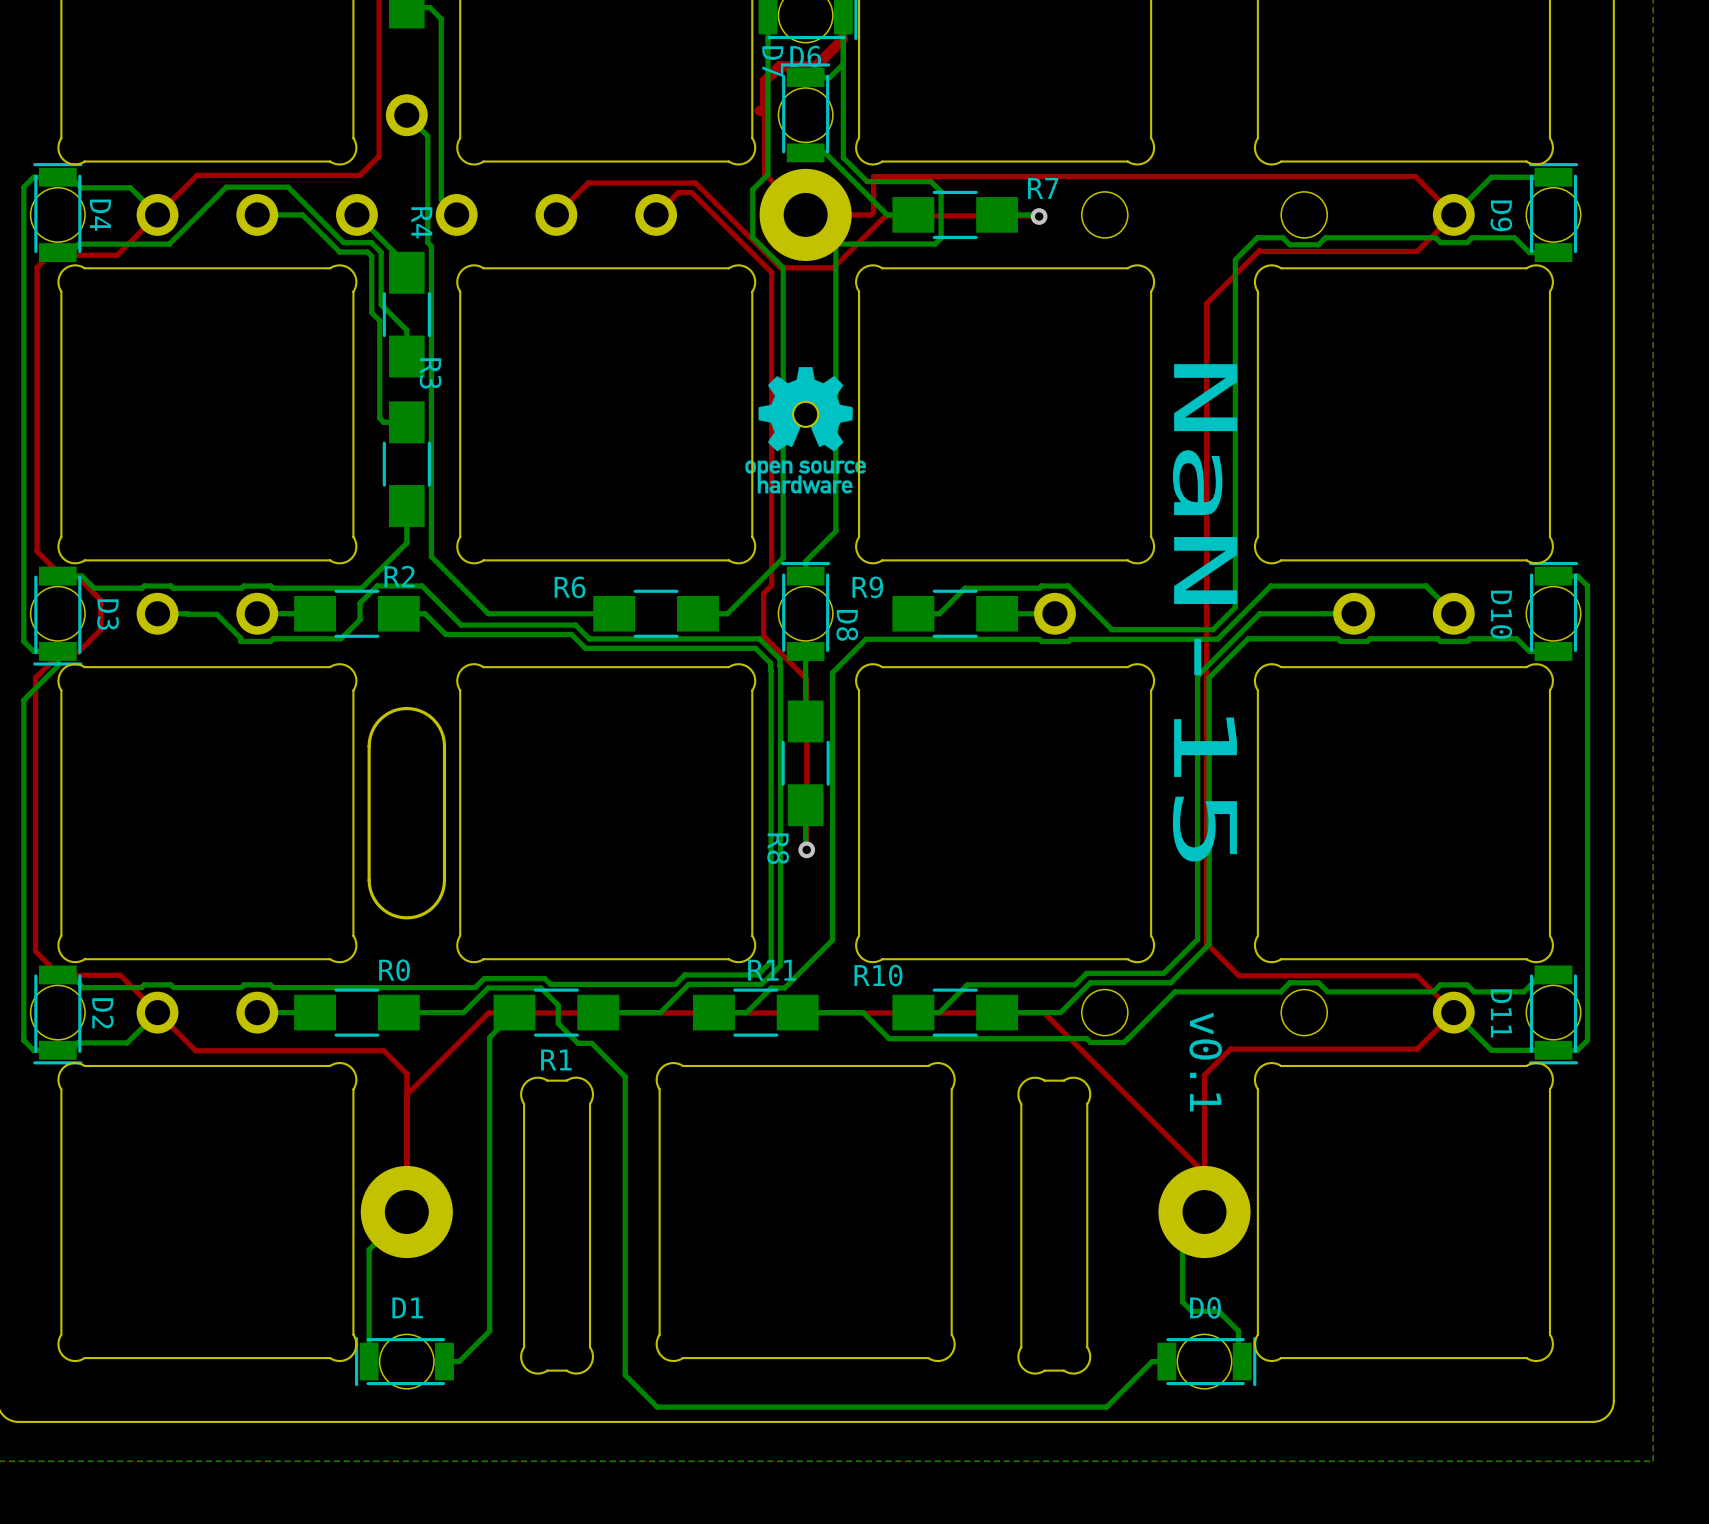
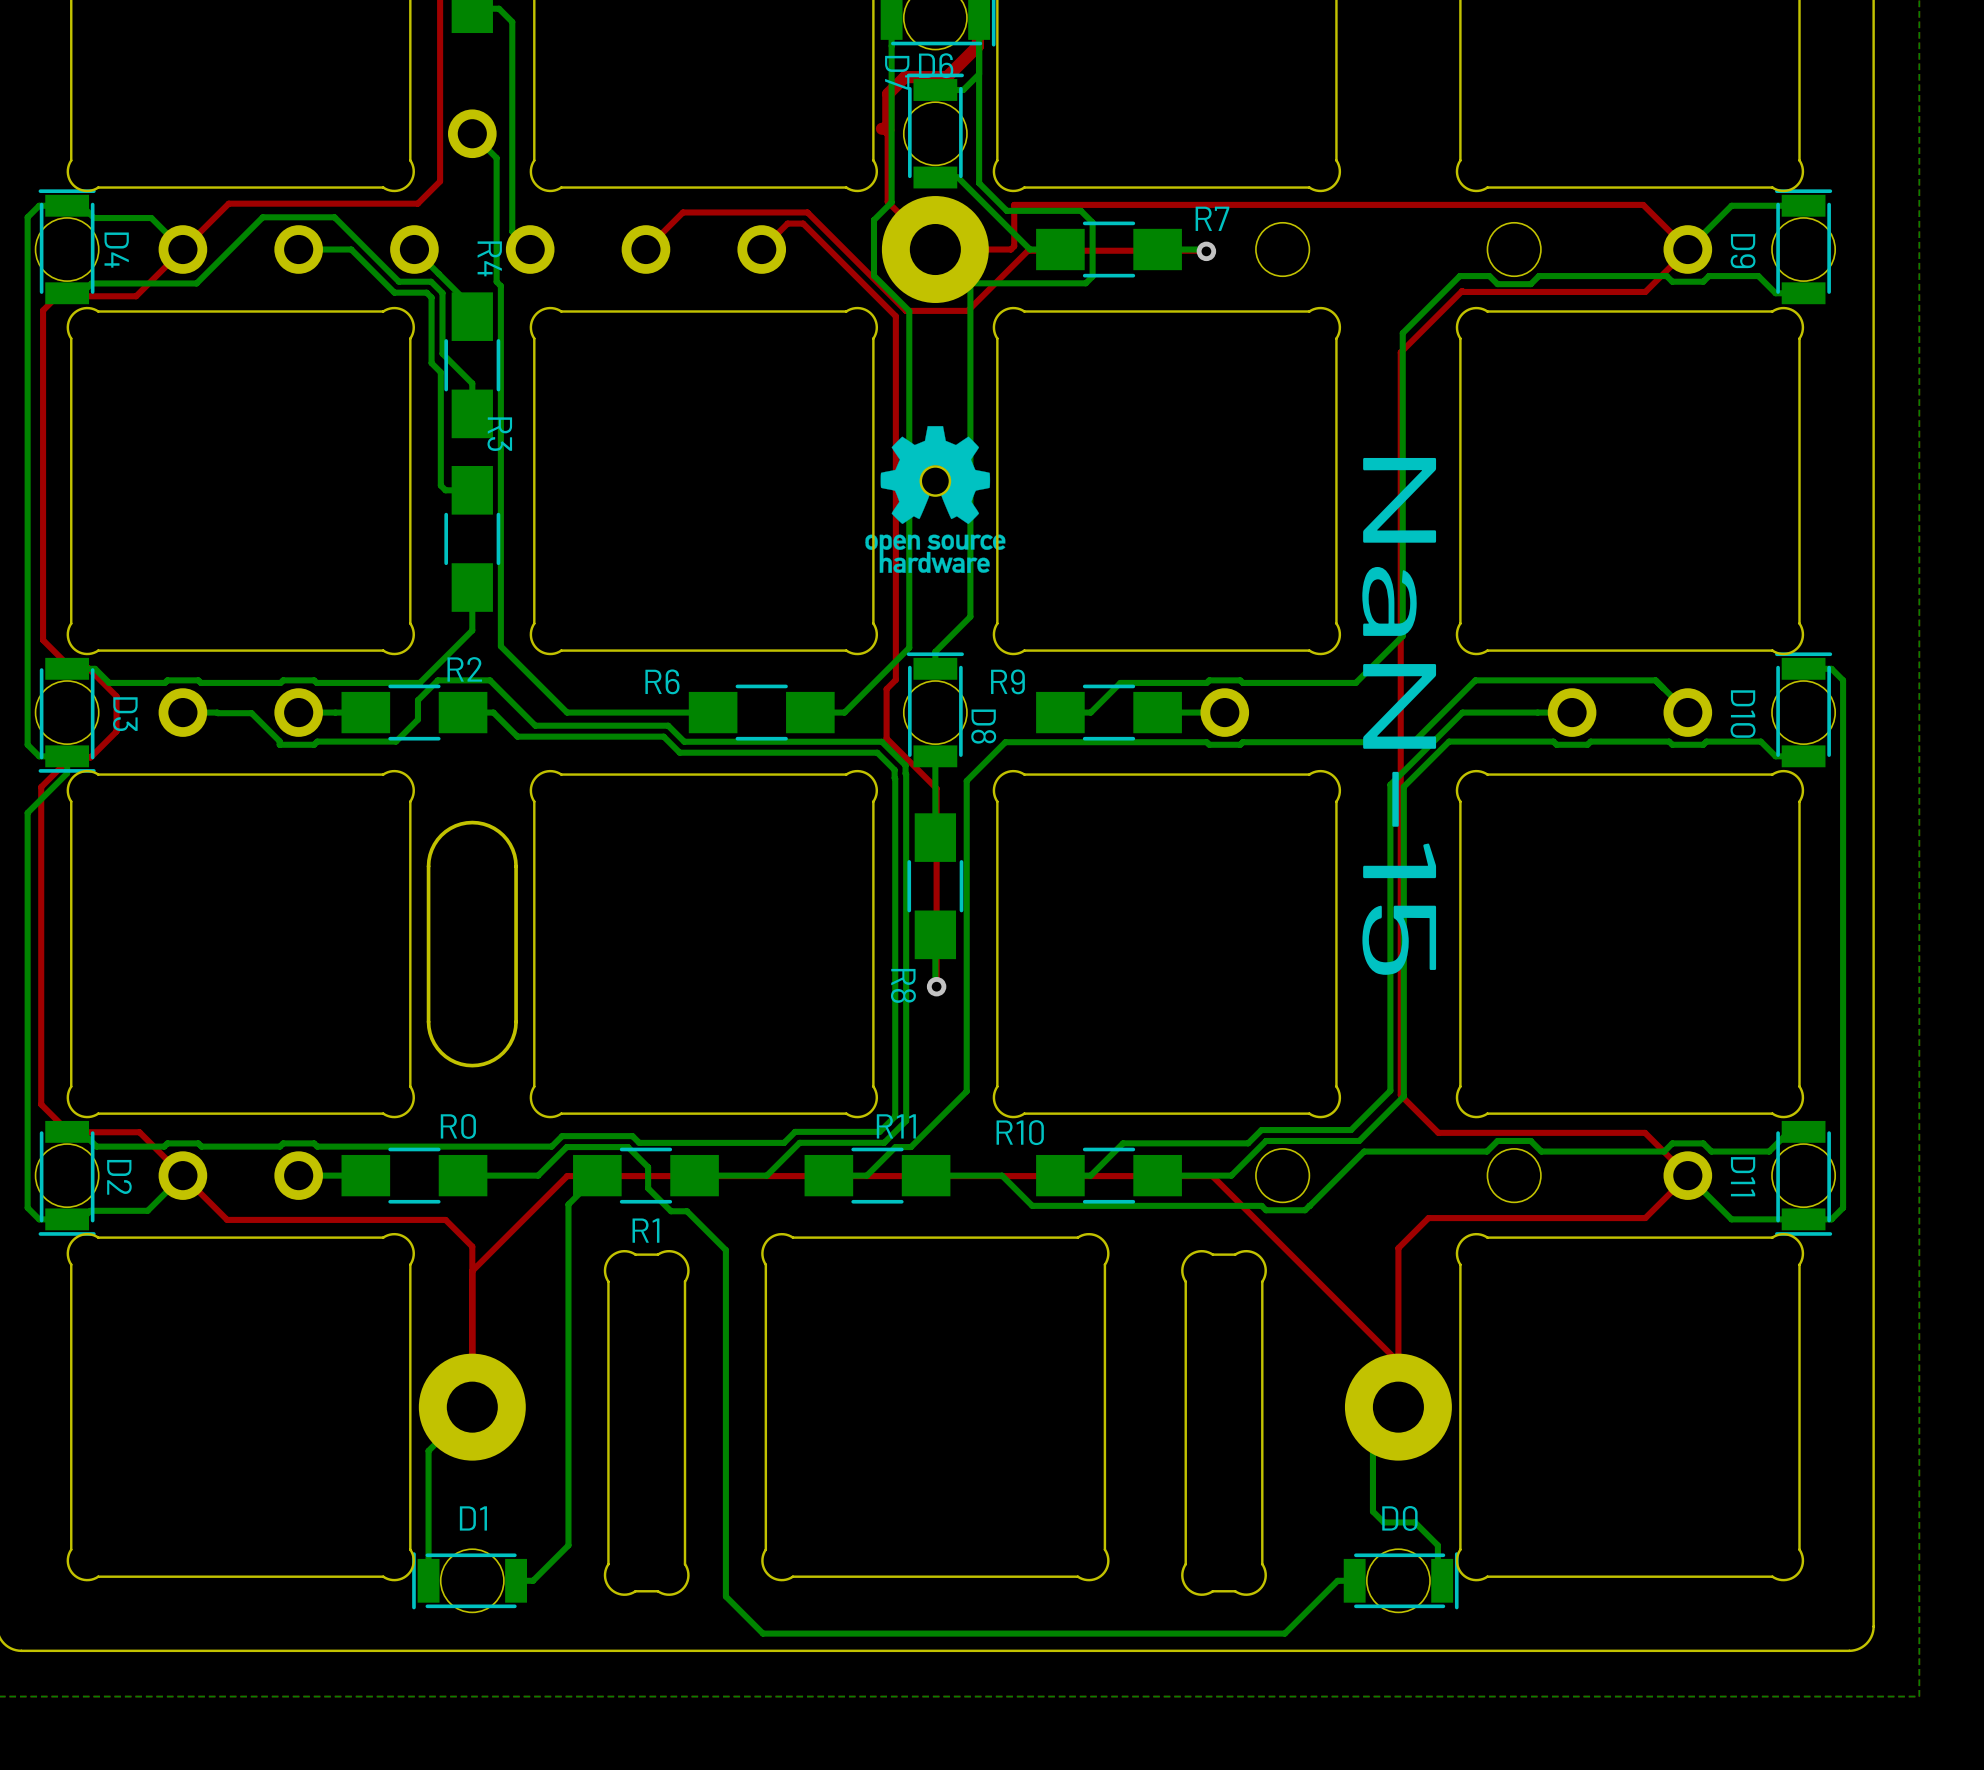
bottom track: (1235, 259) (1235, 607) (1213, 629) (1111, 629) (1070, 588) -> (1434, 301) (1402, 333) (1402, 636) (1355, 682) (1242, 682)
text: v0.1 (1205, 1062) -> none

